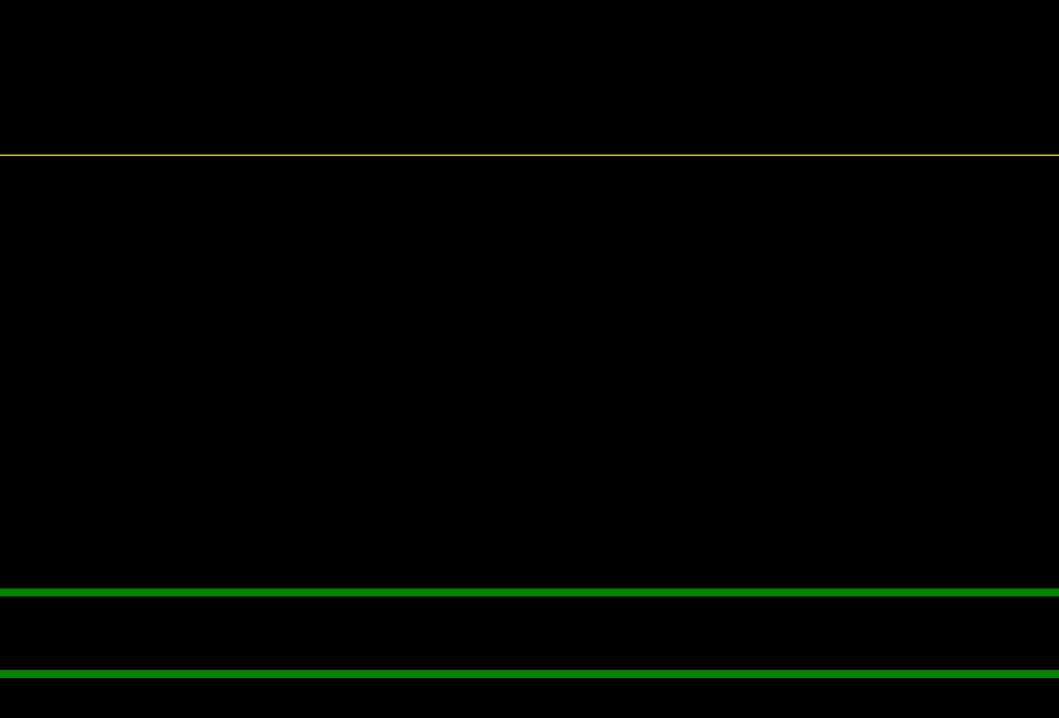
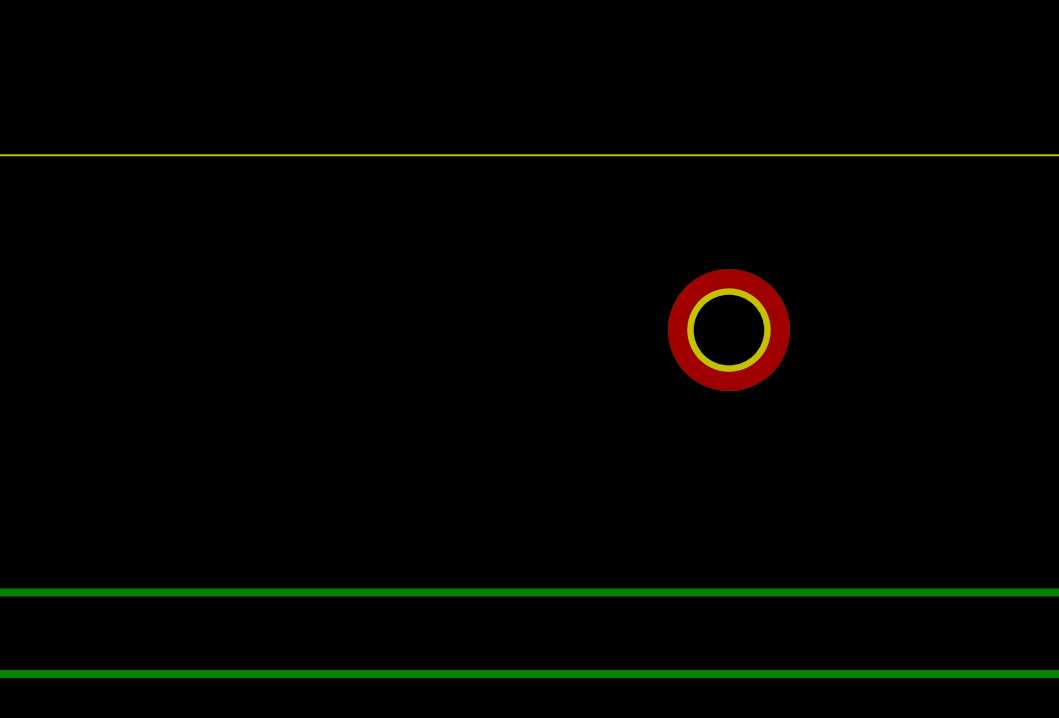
part: none -> (728, 330)

